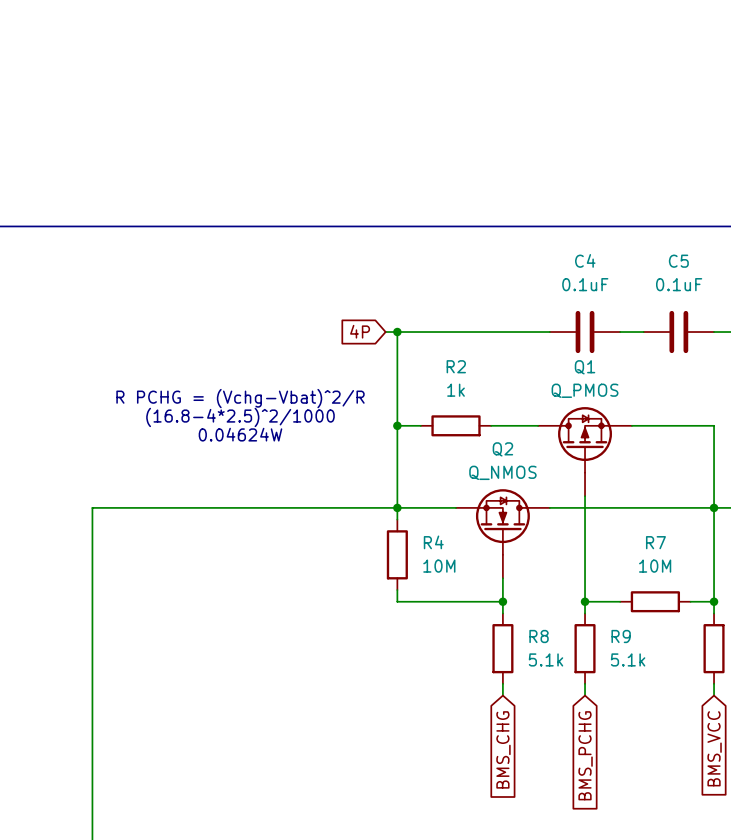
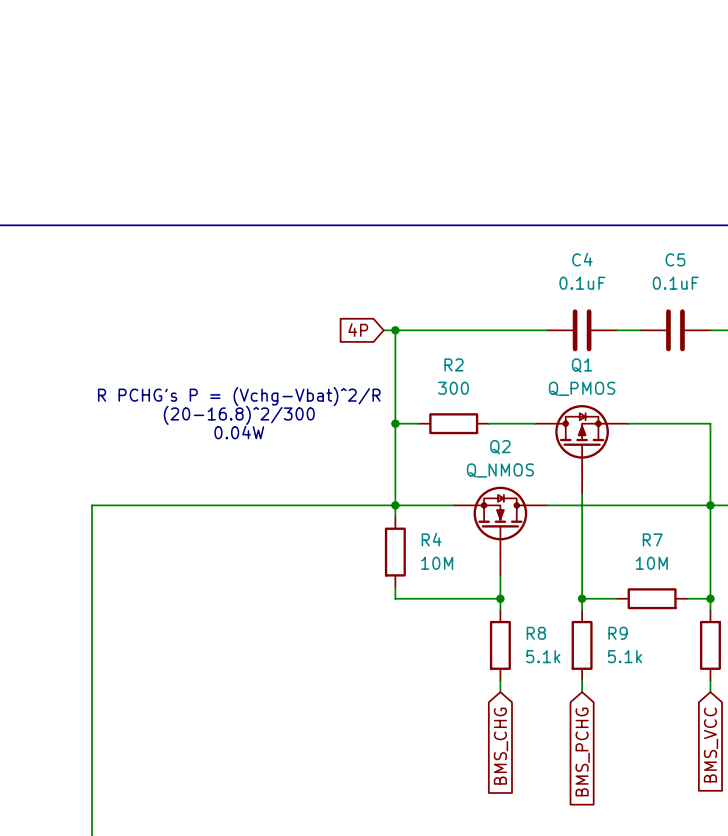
R2 value: 1k (456, 390) -> 300 (453, 388)
text: R PCHG = (Vchg-Vbat)^2/R (240, 398) -> R PCHG's P = (Vchg-Vbat)^2/R (239, 396)
text: (16.8-4*2.5)^2/1000 (240, 417) -> (20-16.8)^2/300 (239, 415)
text: 0.04624W (240, 434) -> 0.04W (239, 432)

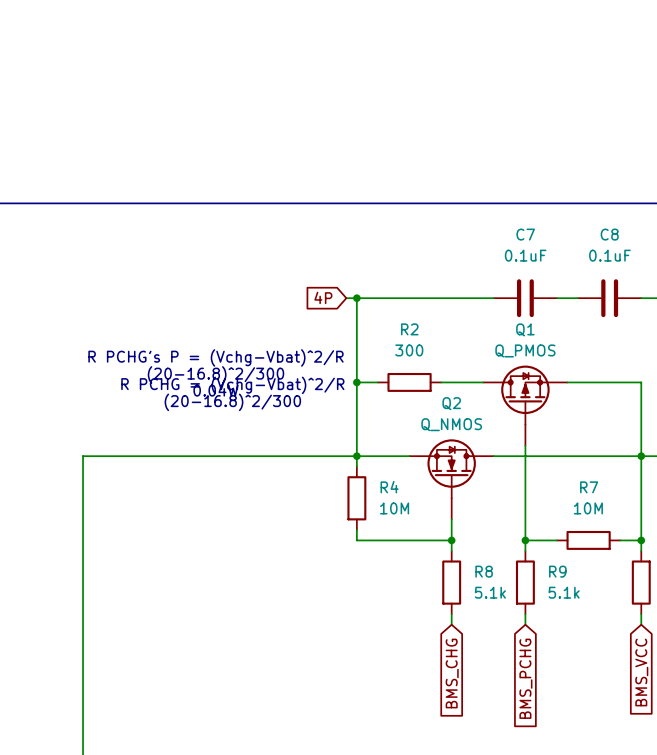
C4 name: C4 (582, 259) -> C7 (525, 234)
C5 name: C5 (675, 259) -> C8 (609, 234)
text: none -> R PCHG = (Vchg-Vbat)^2/R (232, 385)
text: none -> (20-16.8)^2/300 (232, 402)

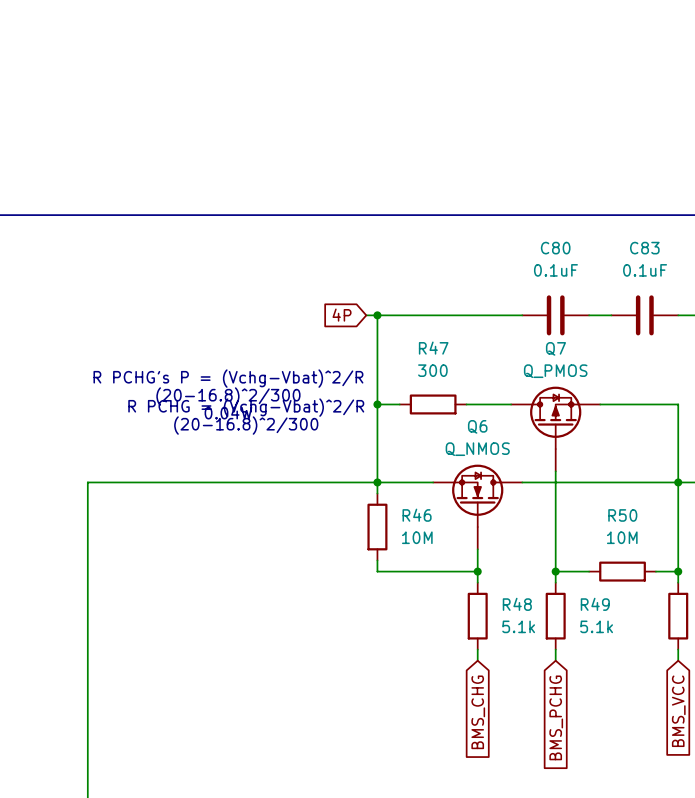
C7 name: C7 (525, 234) -> C80 (555, 248)
C8 name: C8 (609, 234) -> C83 (644, 248)
R2 name: R2 (409, 329) -> R47 (433, 348)
Q1 name: Q1 (525, 329) -> Q7 (555, 348)
Q2 name: Q2 (451, 403) -> Q6 (477, 426)
R4 name: R4 (389, 487) -> R46 (417, 515)
R7 name: R7 (589, 487) -> R50 (622, 515)
R8 name: R8 (484, 571) -> R48 (517, 604)
R9 name: R9 (557, 571) -> R49 (595, 604)

